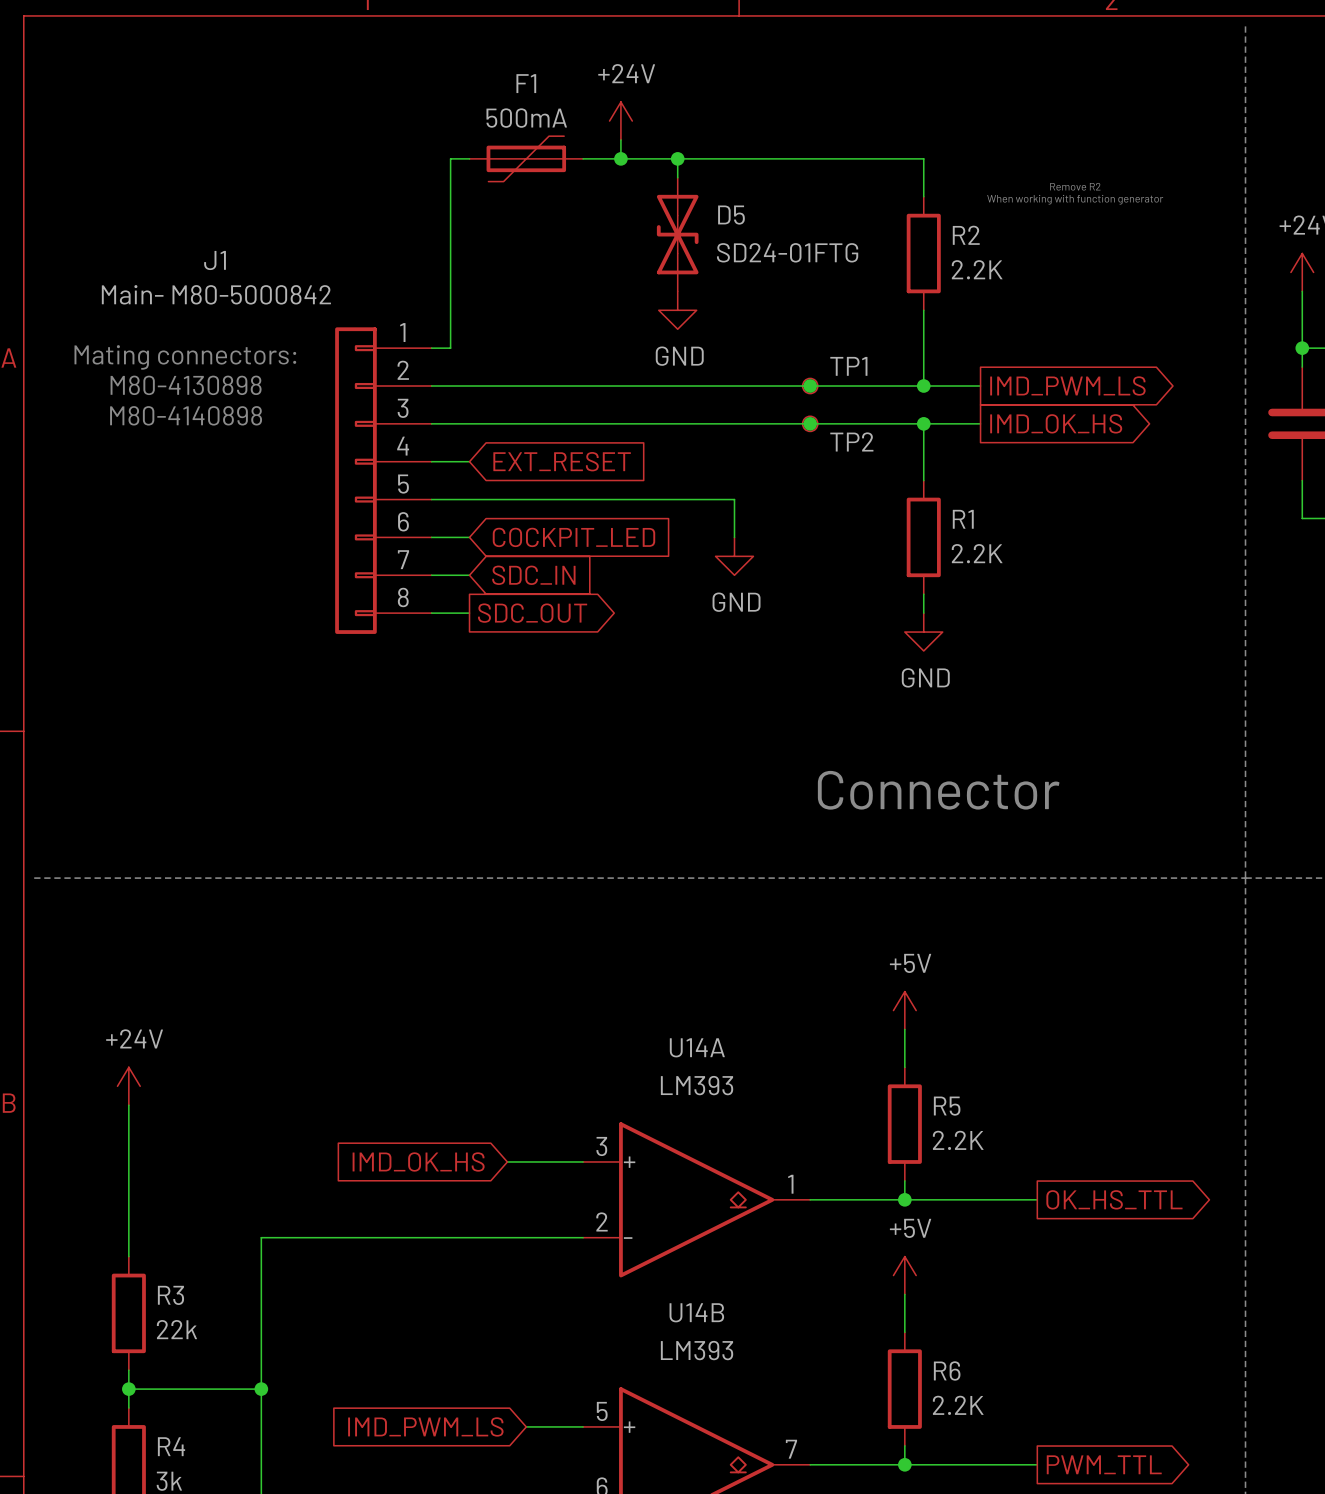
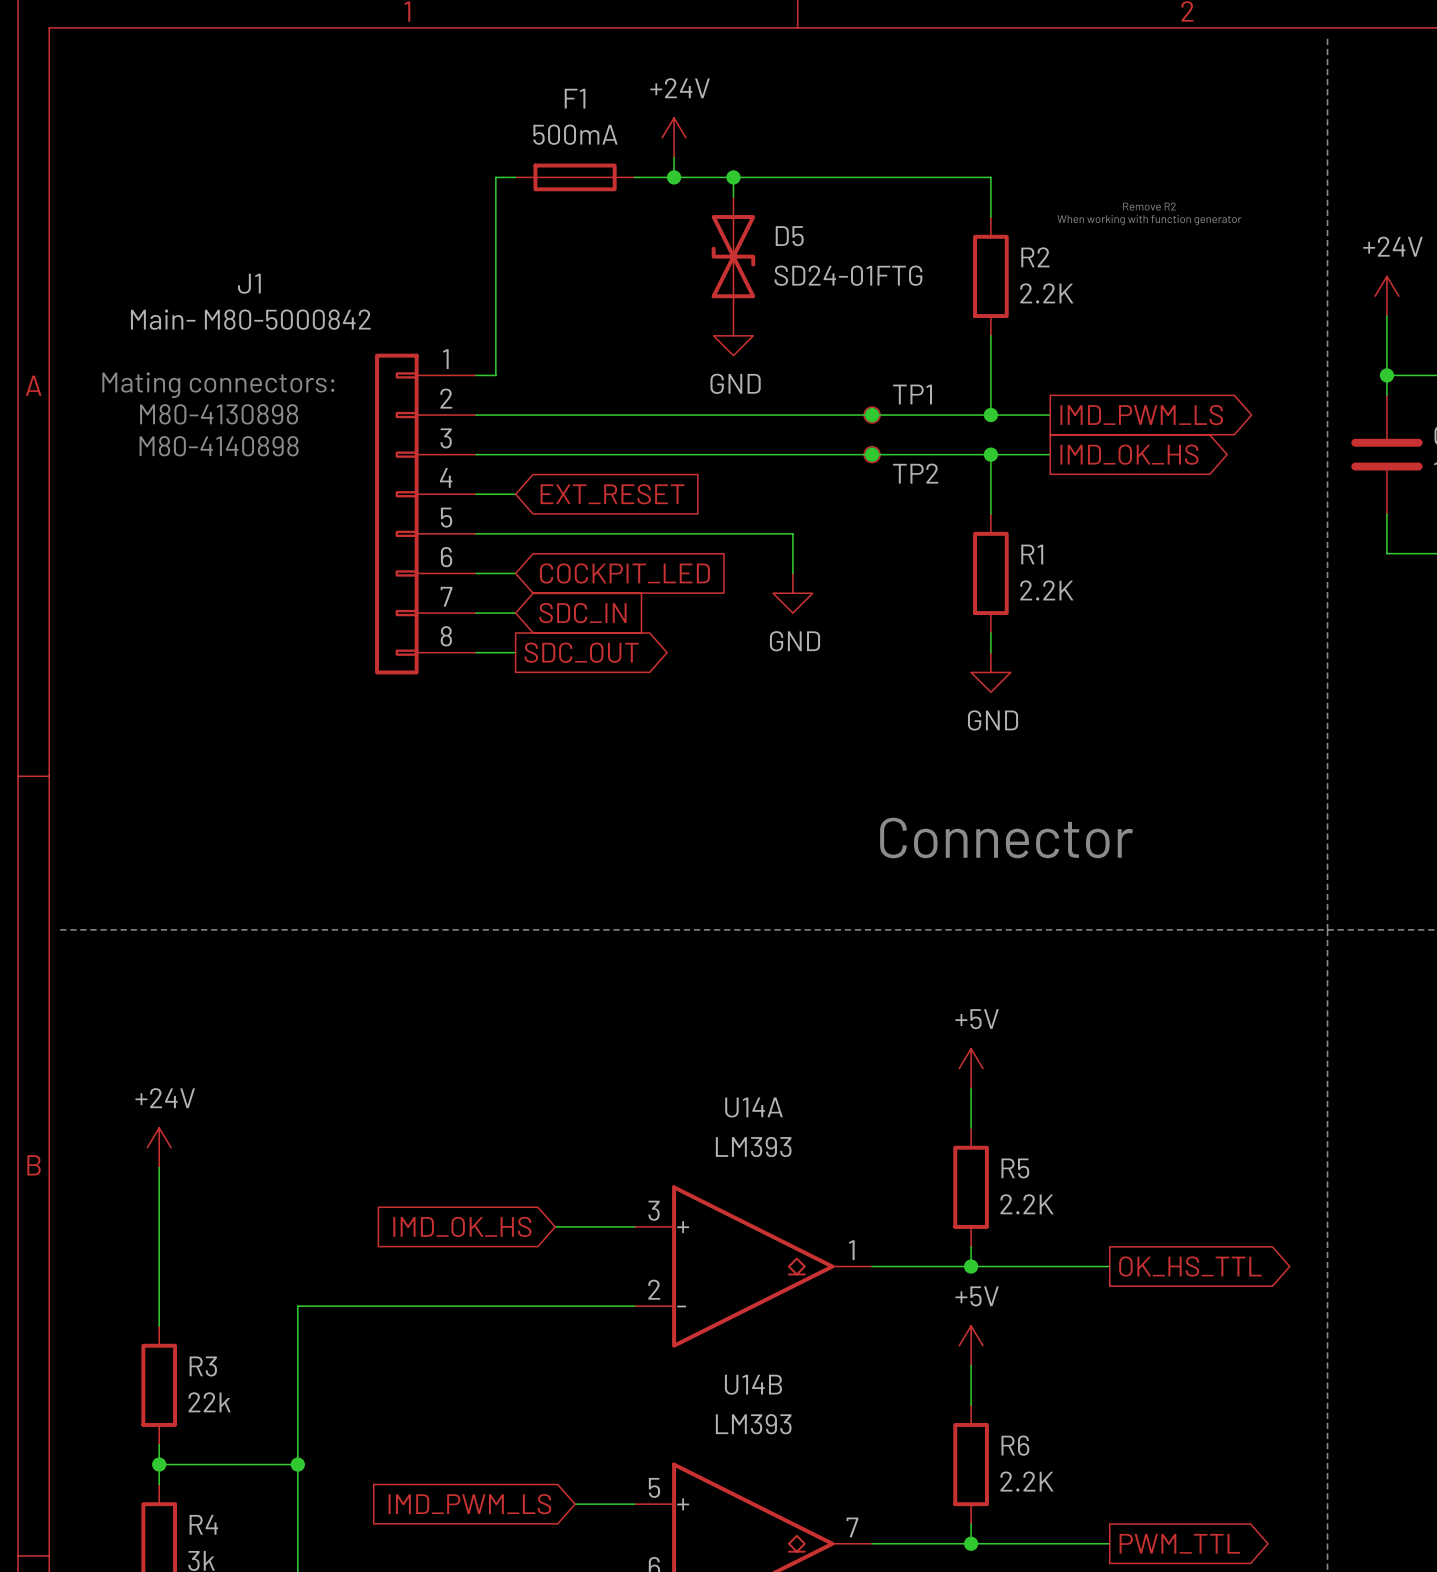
F1 symbol: [469, 136, 584, 182] -> [515, 163, 635, 192]

